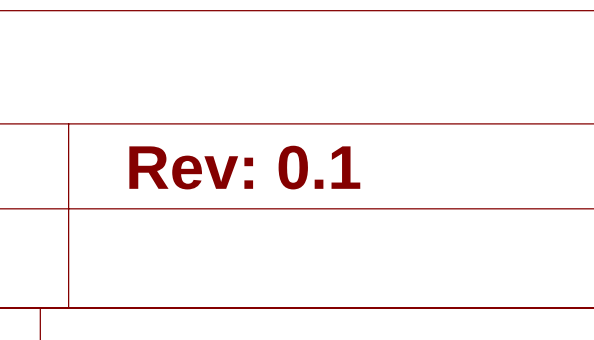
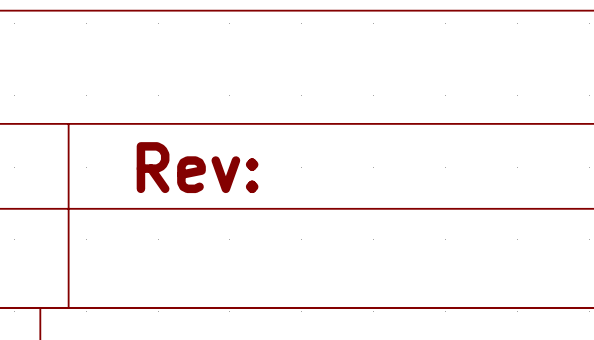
title block: Rev: 0.1 (244, 167) -> Rev: (197, 167)

